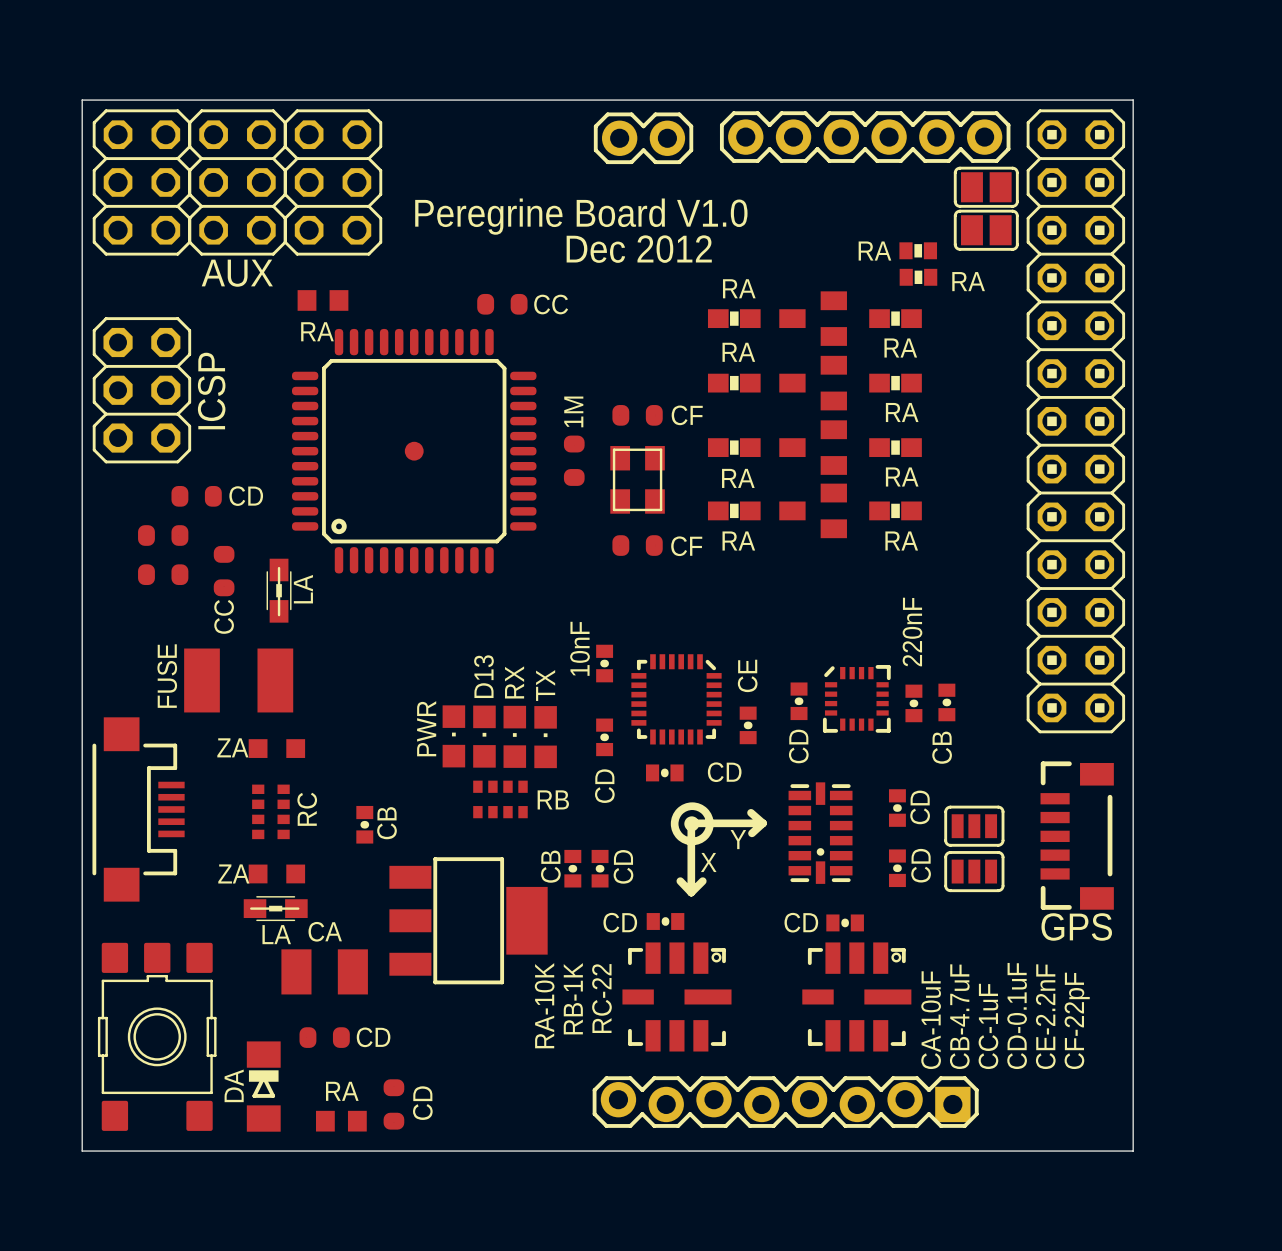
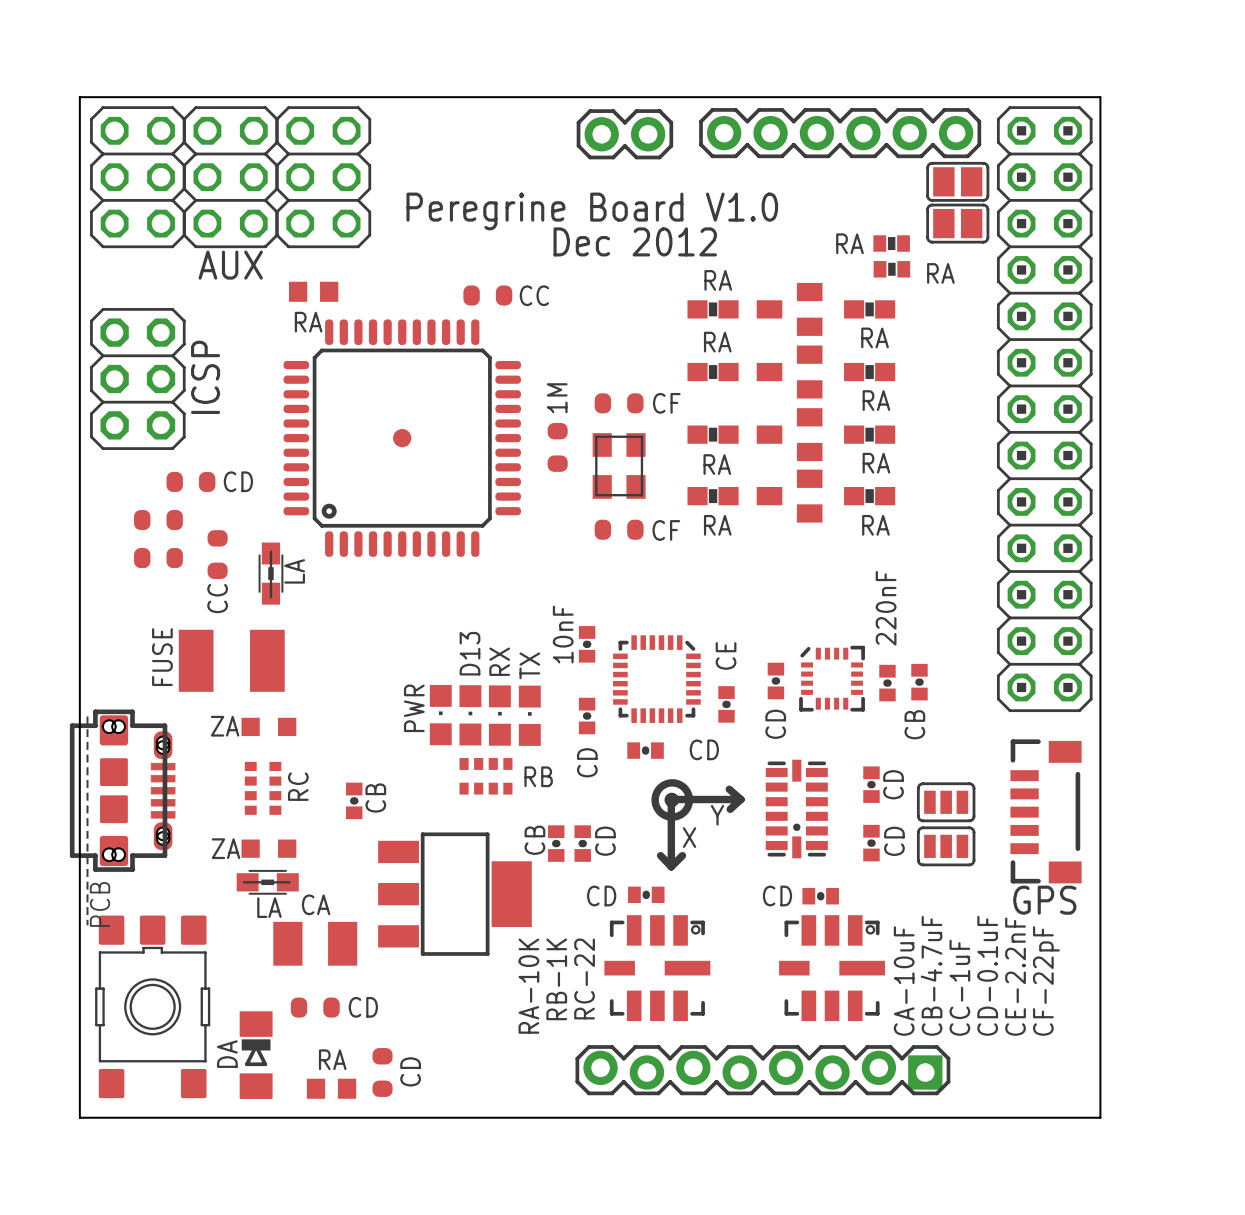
part: (138, 809) -> none
part: none -> (122, 817)

